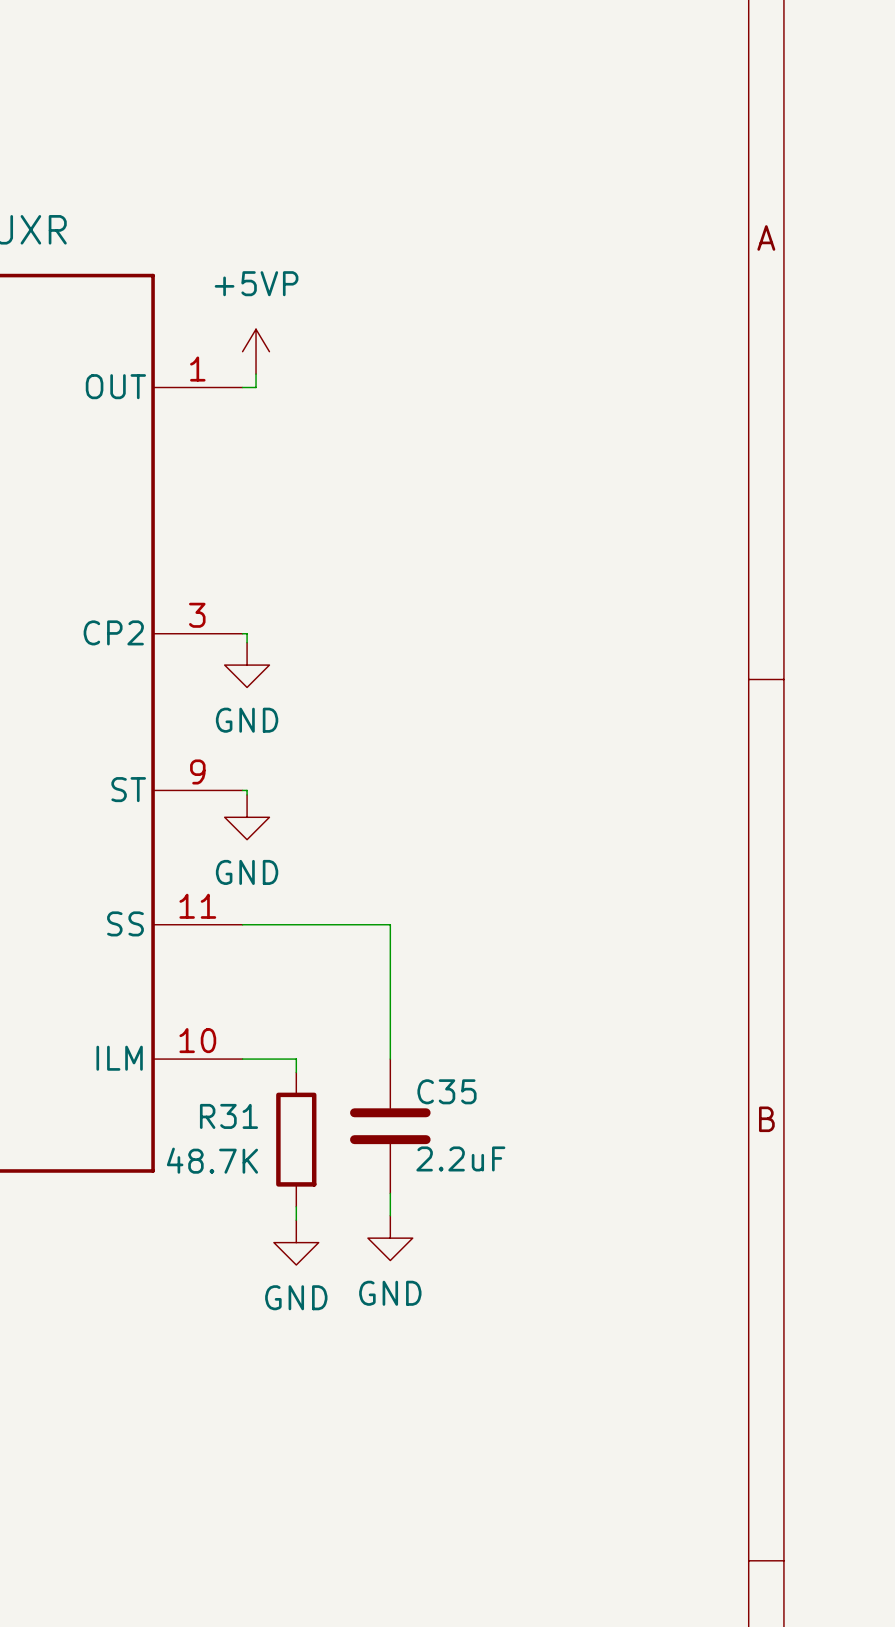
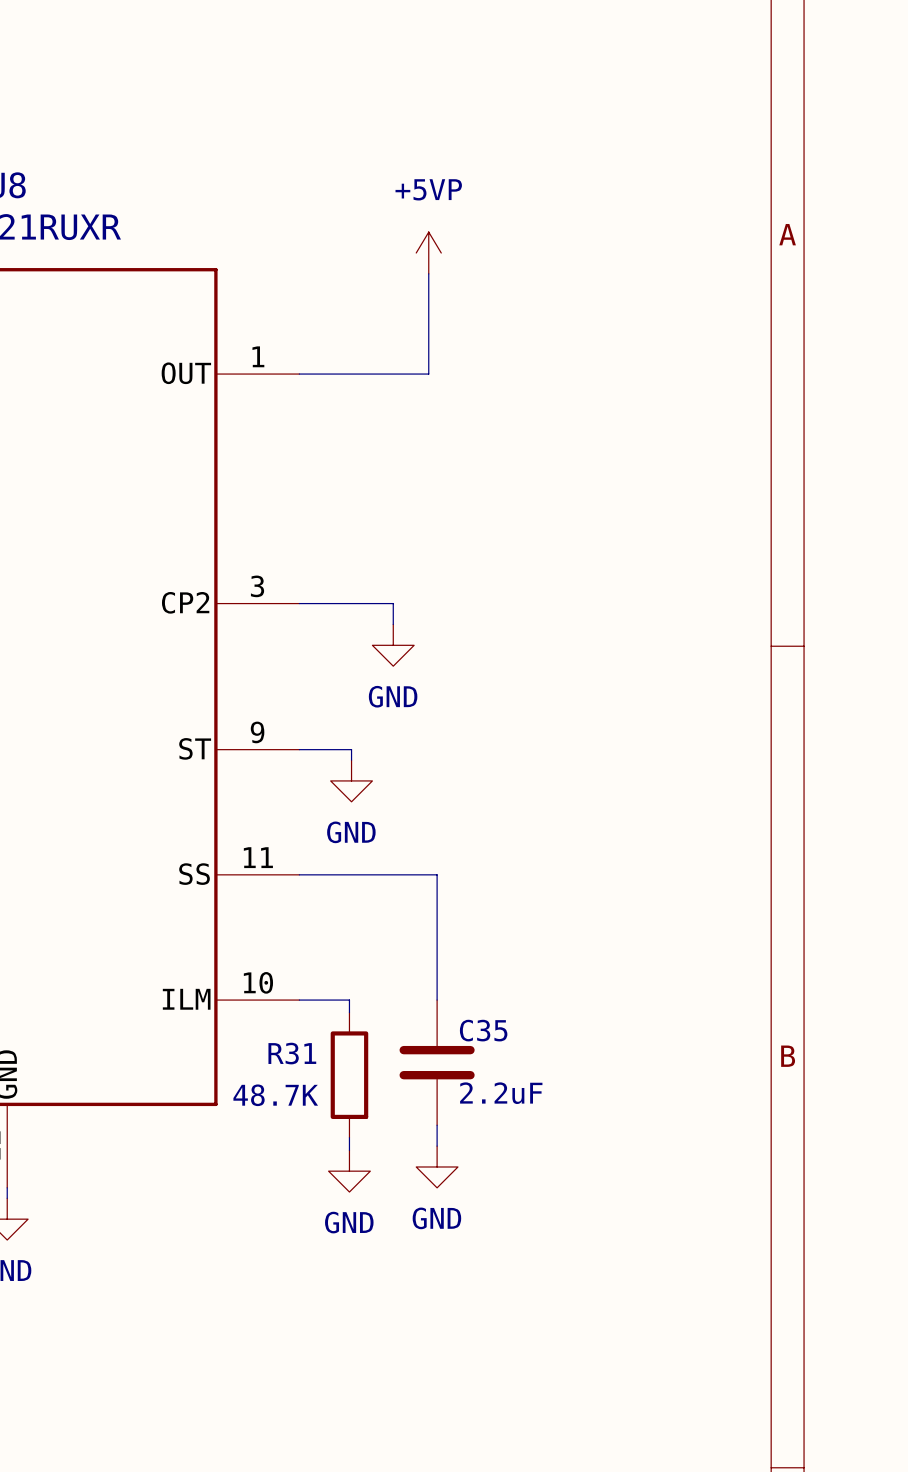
power symbol position: +5VP (256, 351) -> +5VP (428, 253)
wire: (256, 374) (256, 387) -> (428, 273) (428, 374) (311, 374)
wire: (247, 633) (247, 642) -> (303, 603) (393, 603) (393, 624)
power symbol: GND (247, 665) -> none
power symbol: none -> GND (393, 645)
wire: (247, 790) (247, 794) -> (303, 749) (351, 749) (351, 760)
power symbol position: GND (247, 817) -> GND (351, 780)

